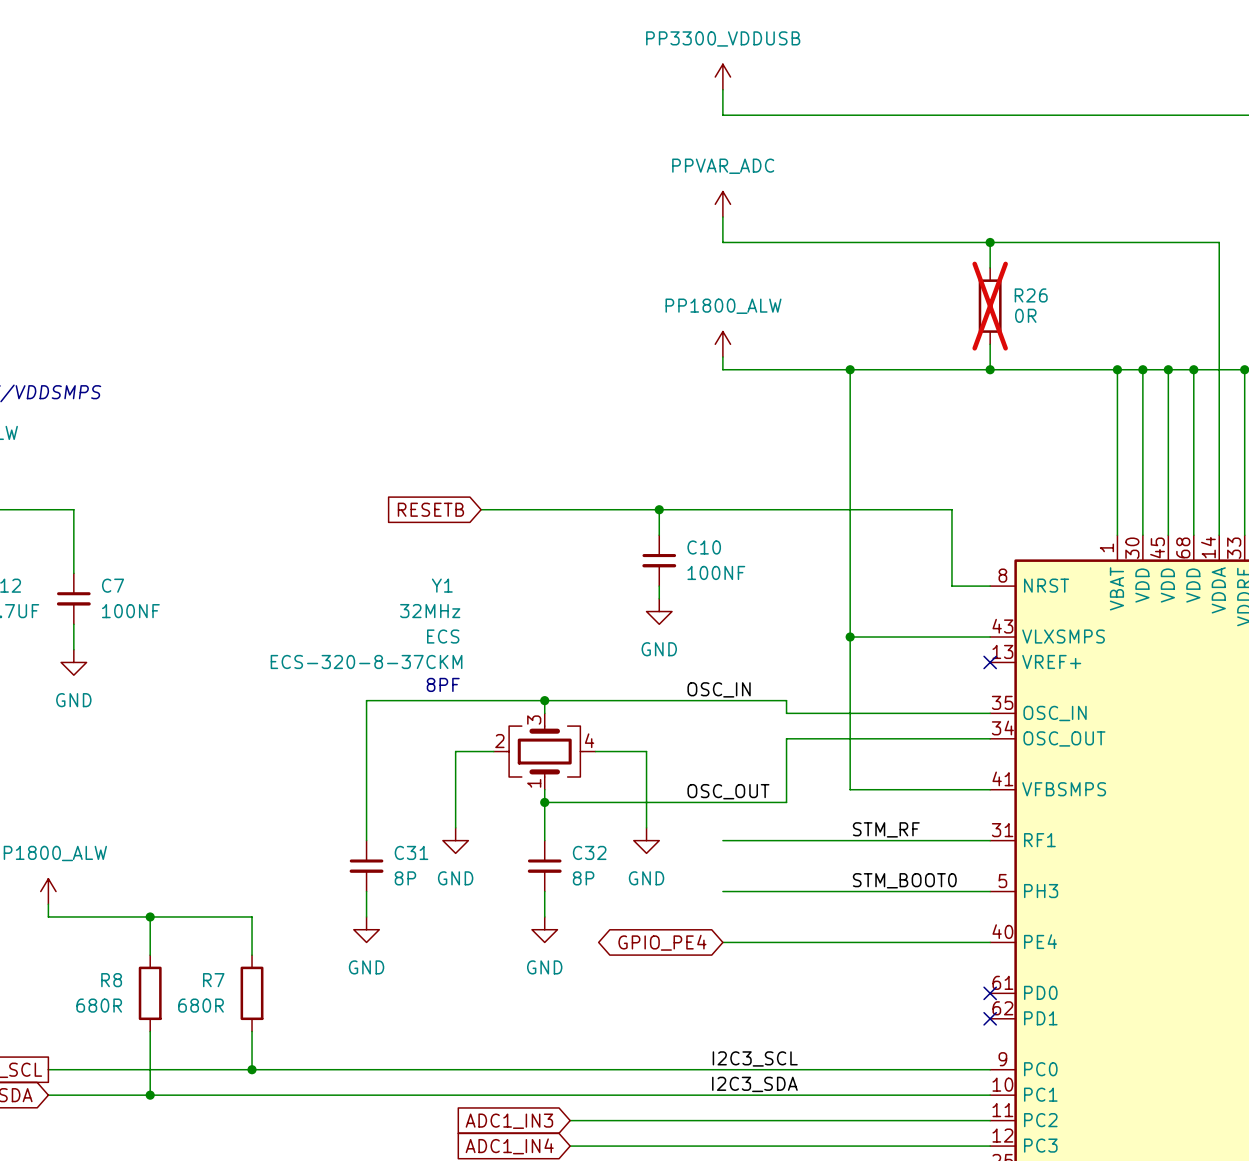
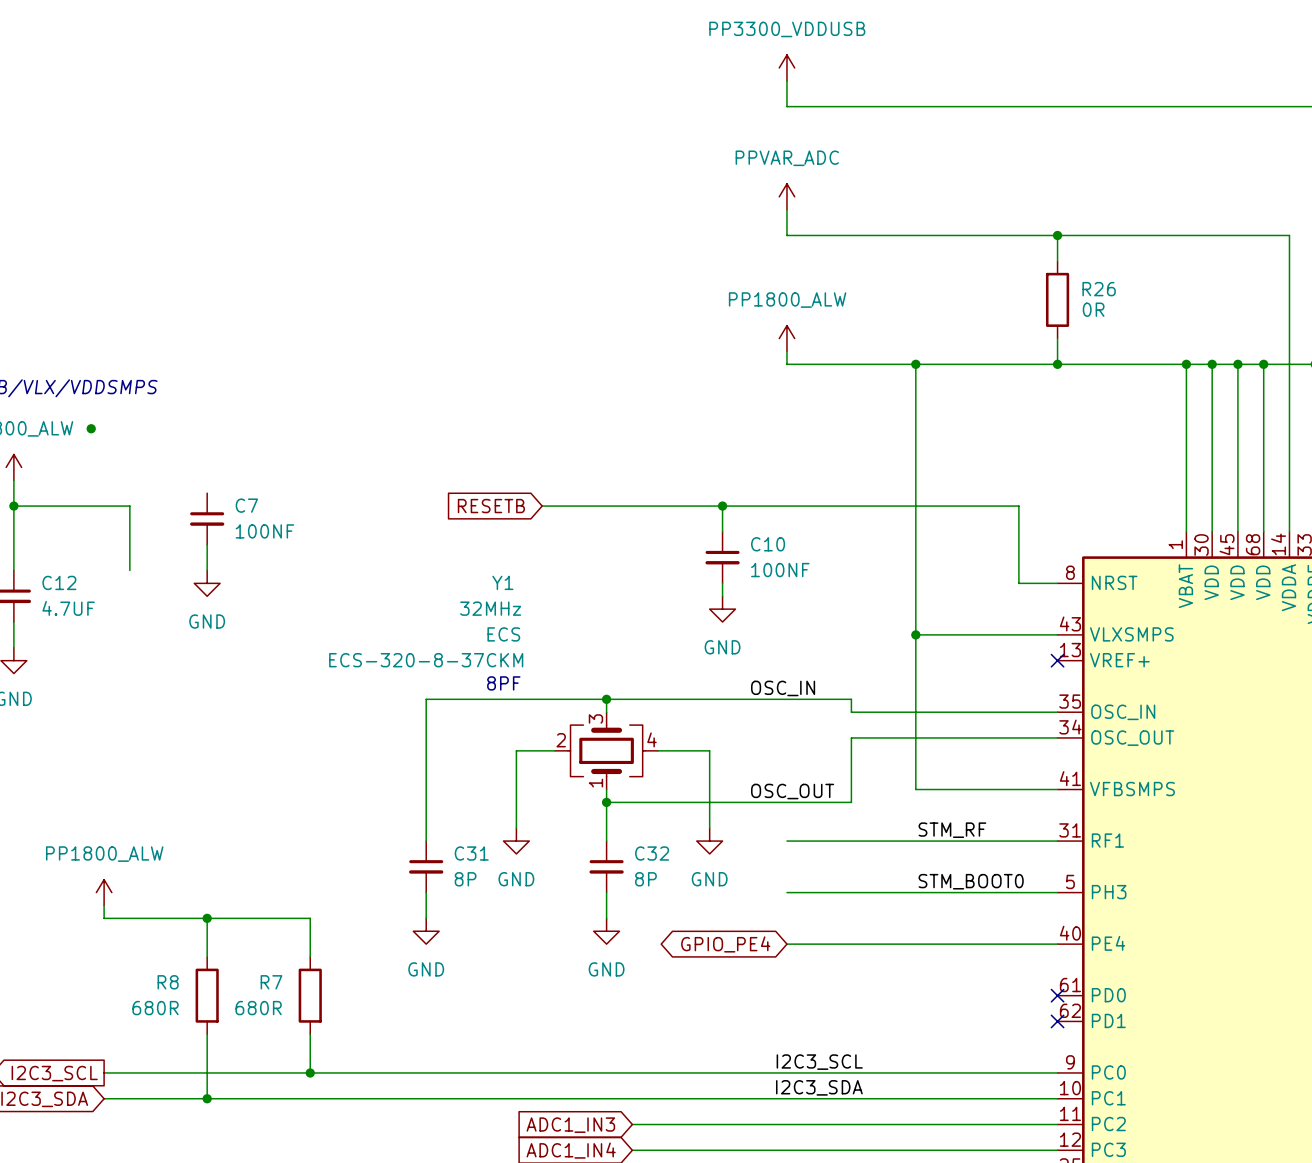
R26 do-not-place cross: (990, 306) -> none
junction: none -> (91, 428)
C7 position: (73, 598) -> (207, 518)
wire: (73, 624) (73, 649) -> (207, 544) (207, 570)
power symbol position: GND (73, 662) -> GND (207, 583)

